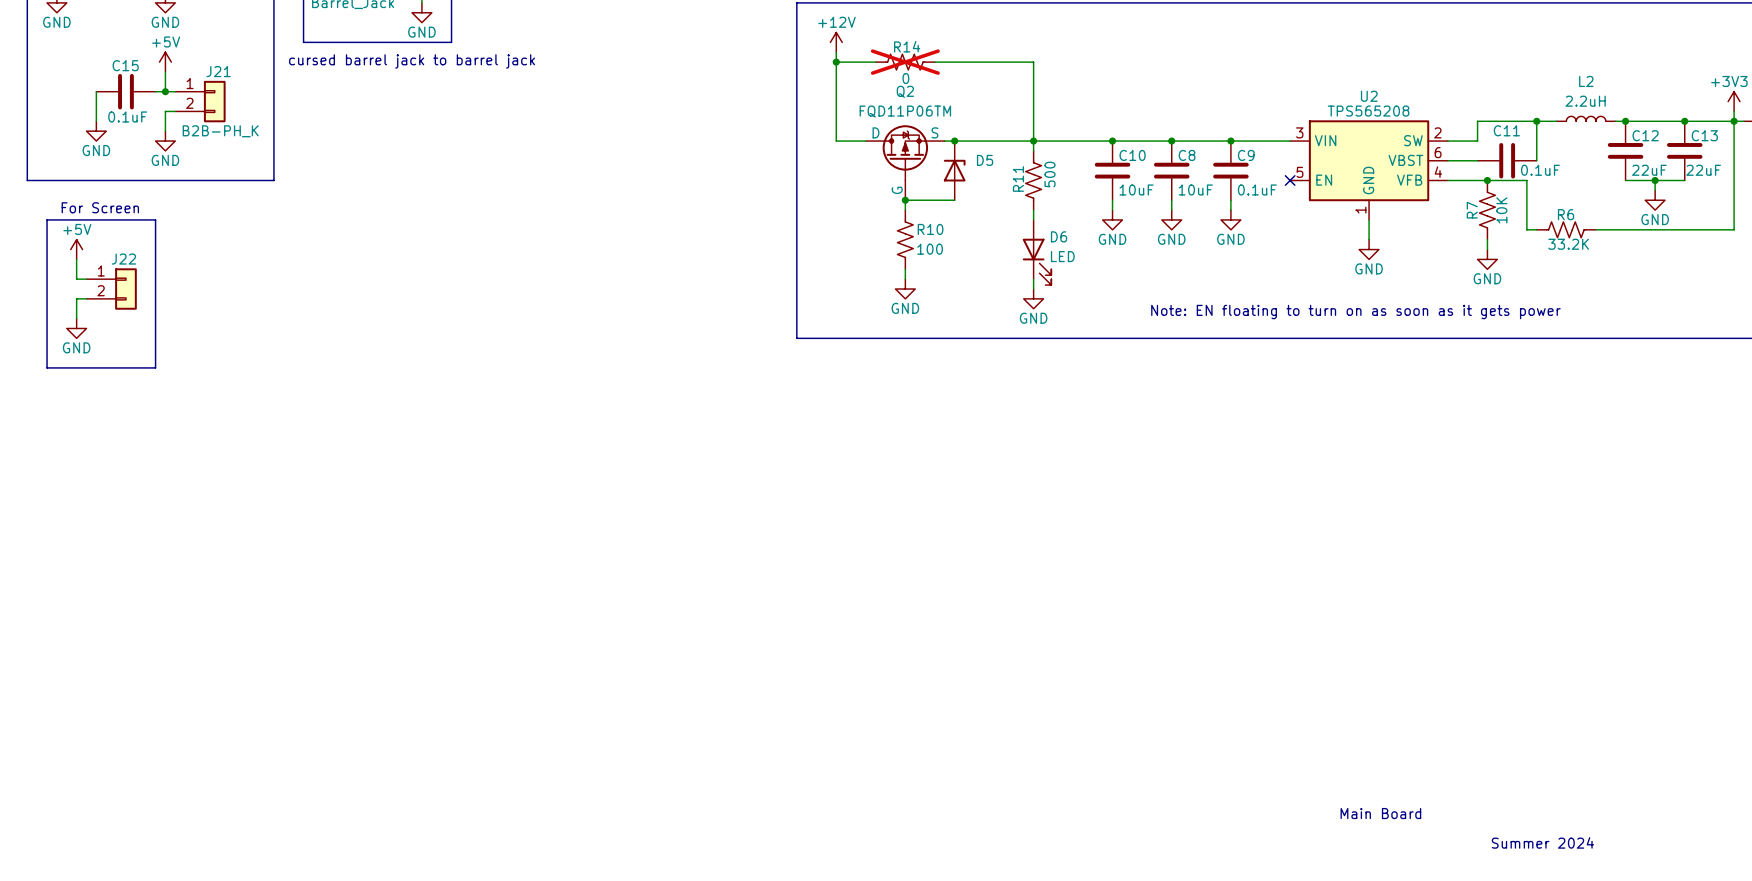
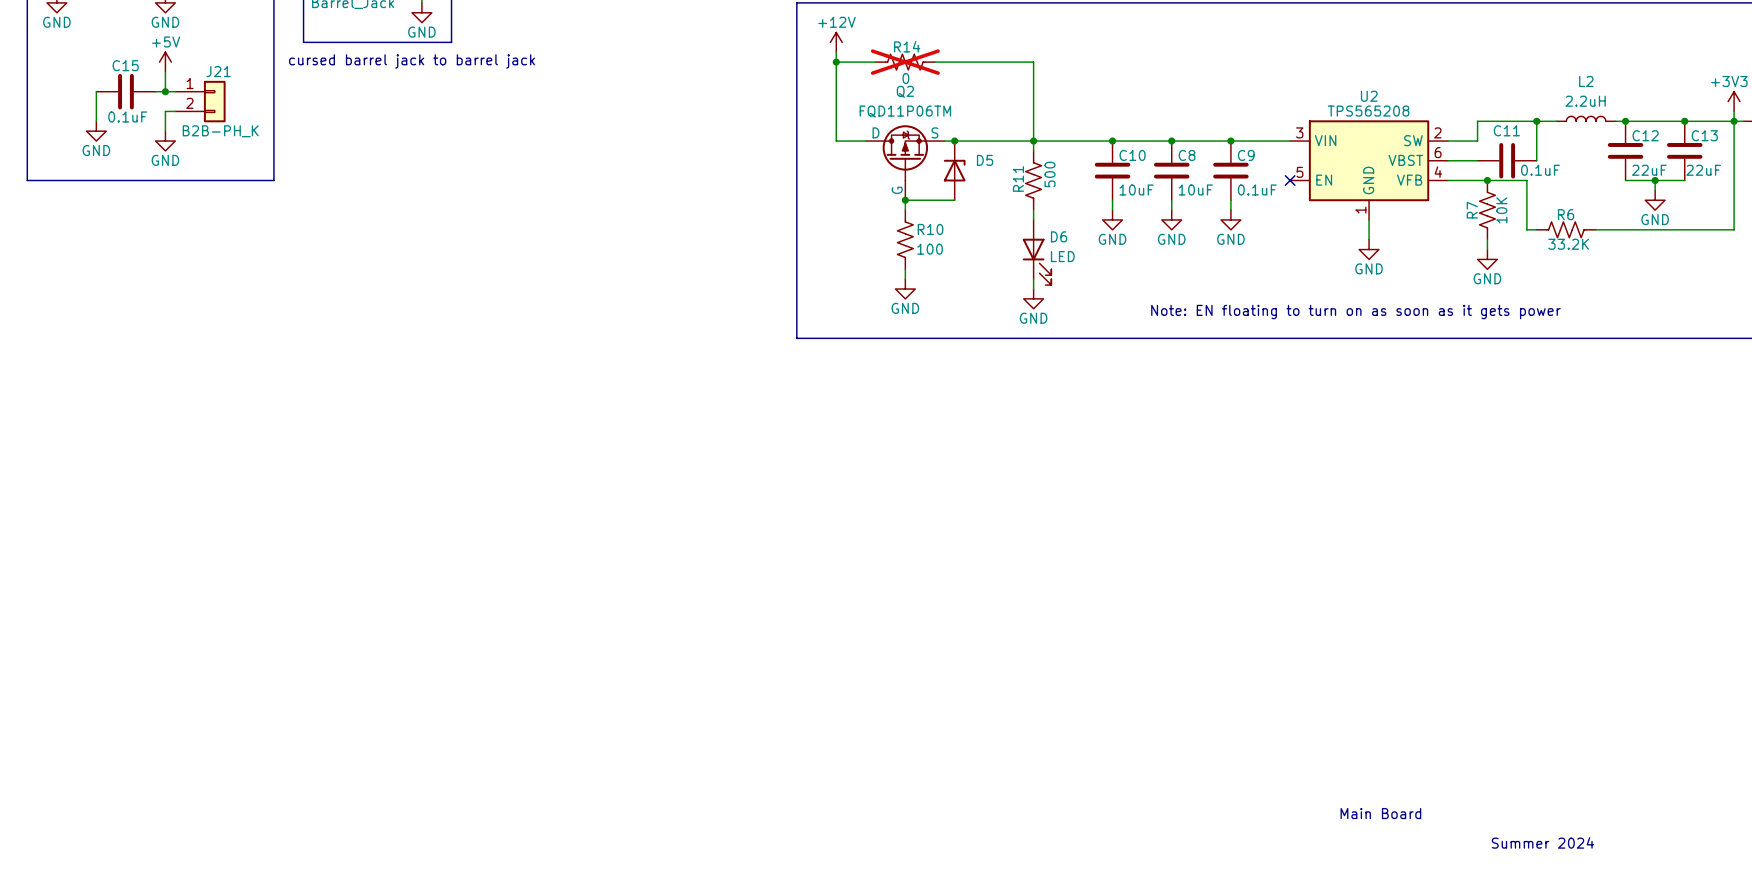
text: For Screen (100, 207) -> none
line: (47, 219) (155, 219) (155, 367) (47, 367) (47, 219) -> none
power symbol: +5V (76, 249) -> none
wire: (76, 259) (76, 279) (86, 279) -> none
J22: (111, 289) -> none
wire: (86, 298) (76, 298) (76, 318) -> none
power symbol: GND (76, 328) -> none

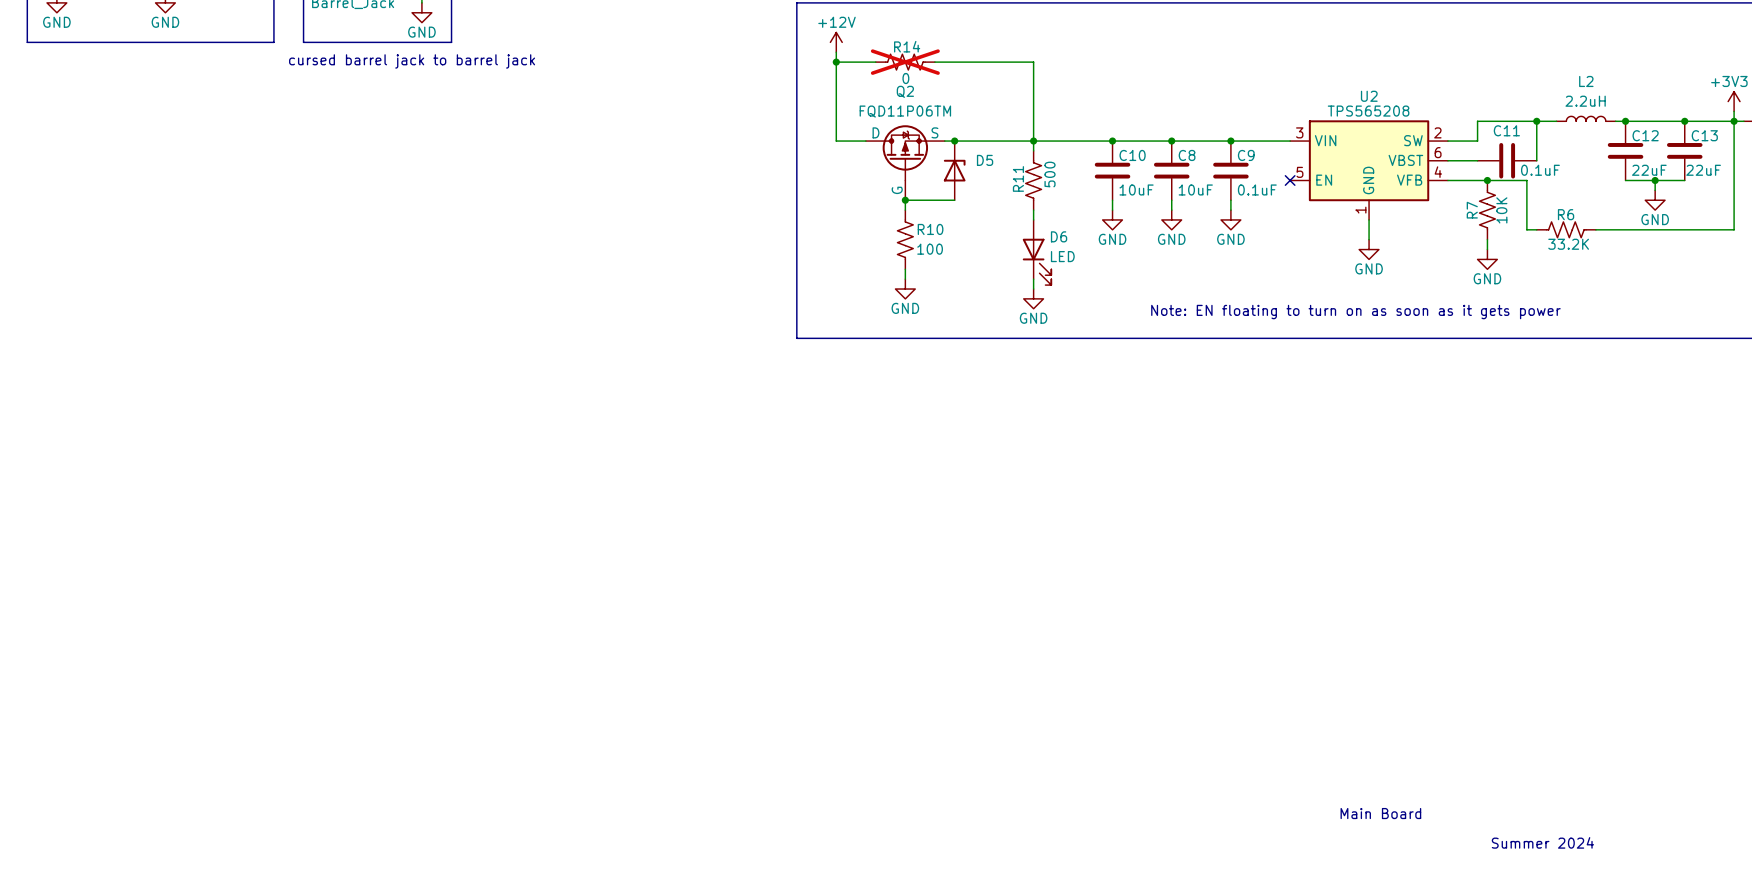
line: (27, 42) (27, 180) (273, 180) (273, 42) -> (27, 42) (273, 42)
power symbol: +5V (165, 62) -> none
wire: (165, 71) (165, 91) -> none
wire: (96, 91) (96, 121) -> none
C15: 0.1uF (125, 91) -> none
wire: (155, 91) (175, 91) -> none
junction: (165, 91) -> none
J21: B2B-PH_K (200, 101) -> none
wire: (175, 111) (165, 111) (165, 131) -> none
power symbol: GND (96, 131) -> none
power symbol: GND (165, 141) -> none

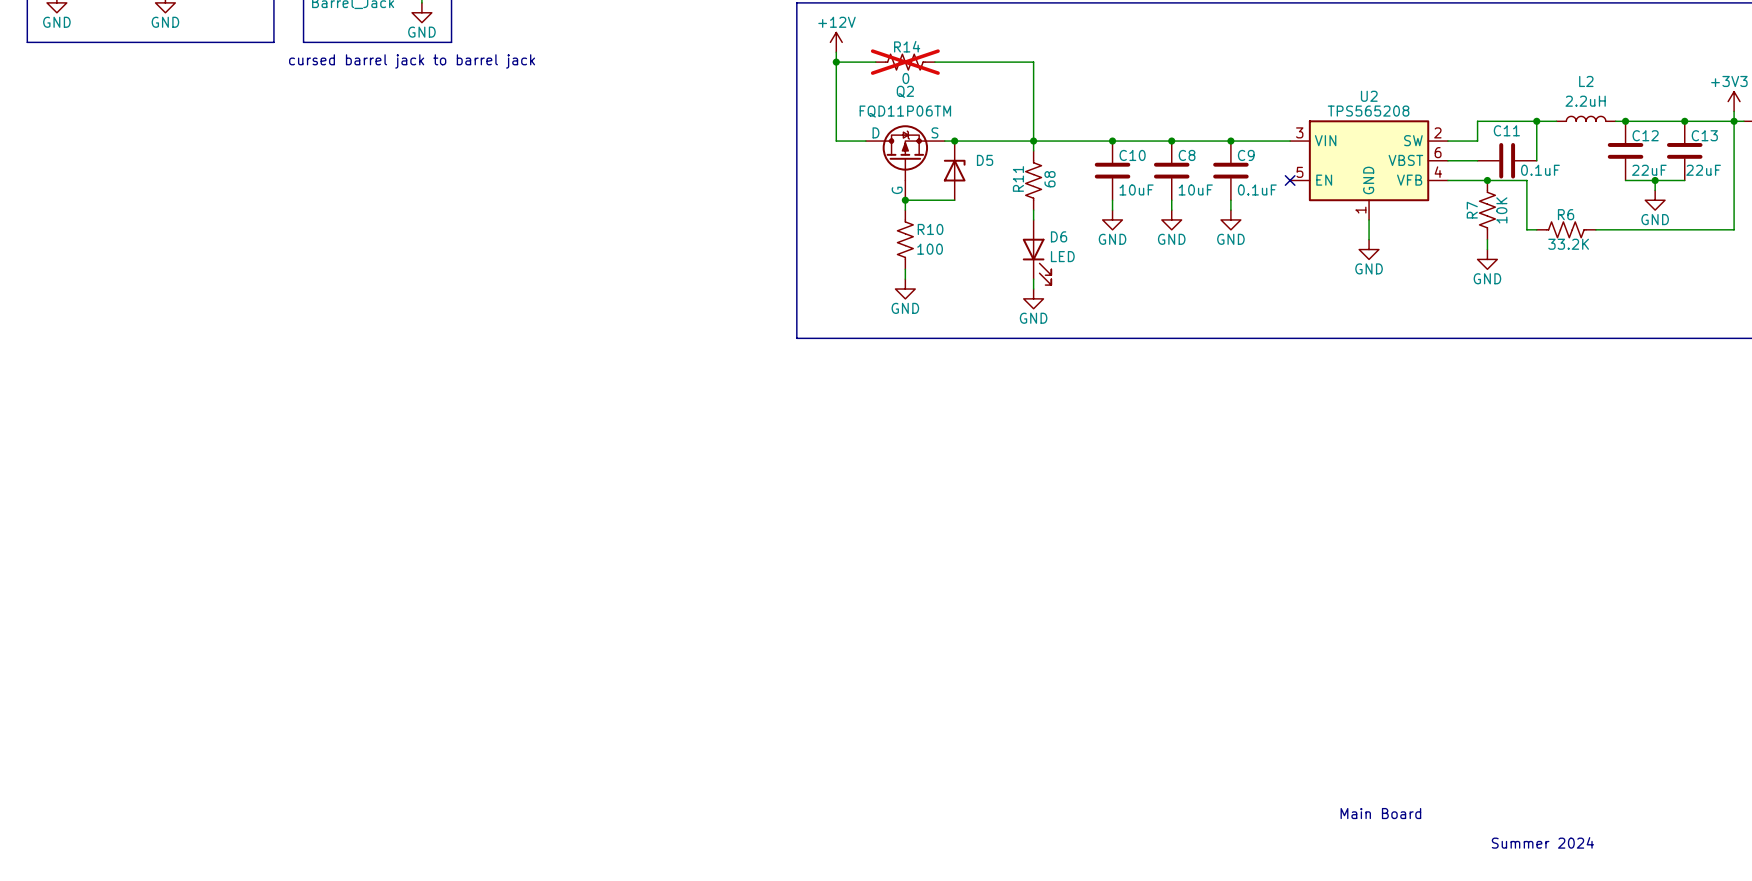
R11 value: 500 (1050, 174) -> 68 (1050, 179)
text: Note: EN floating to turn on as soon as it gets power (1355, 312) -> none

